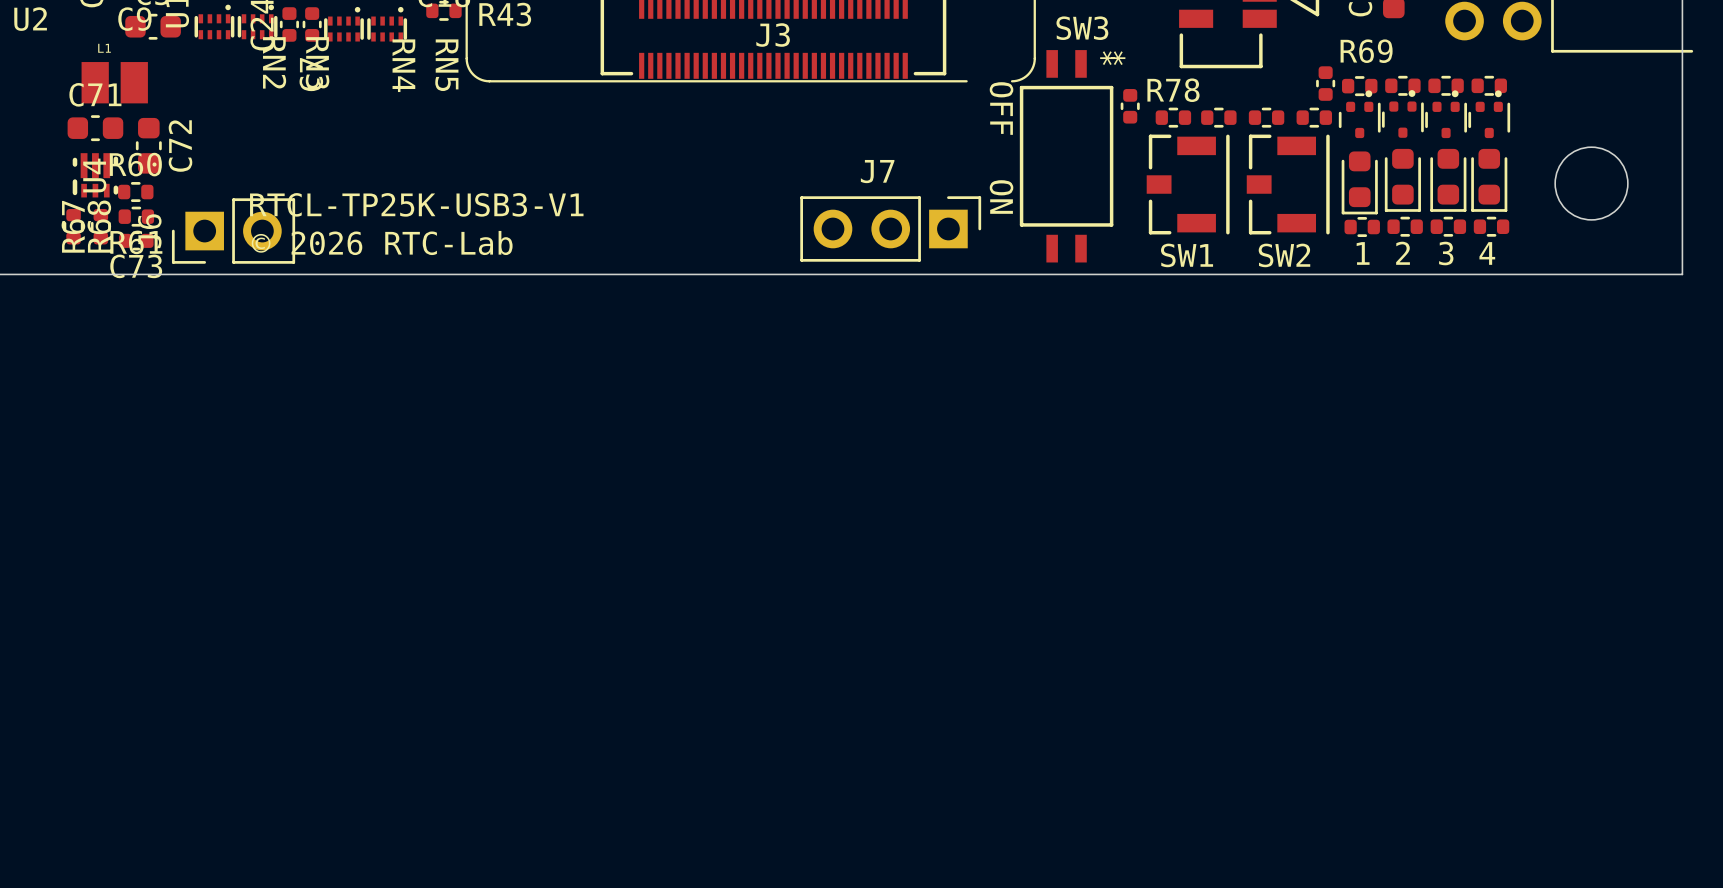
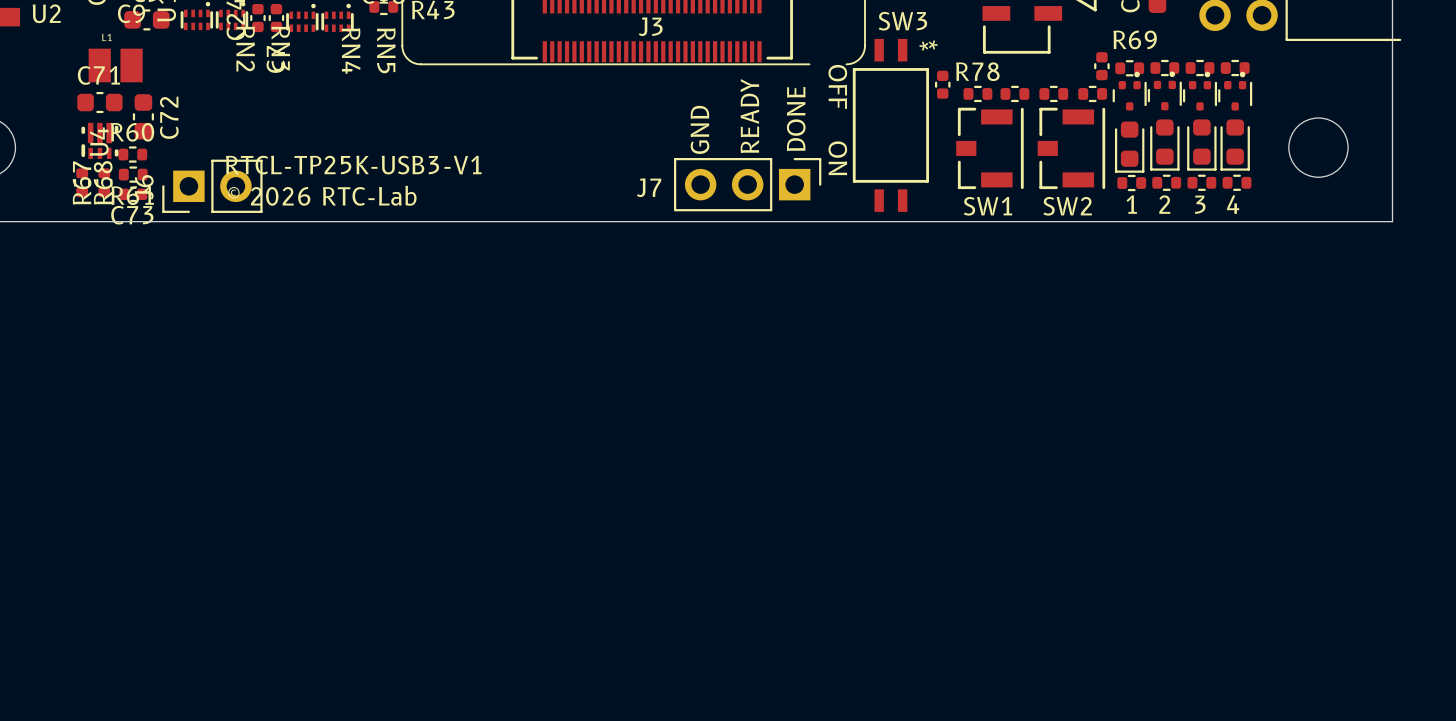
text: none -> READY (749, 116)
text: none -> DONE (796, 118)
text: none -> GND (699, 129)
J7 name position: J7 (877, 171) -> J7 (649, 187)

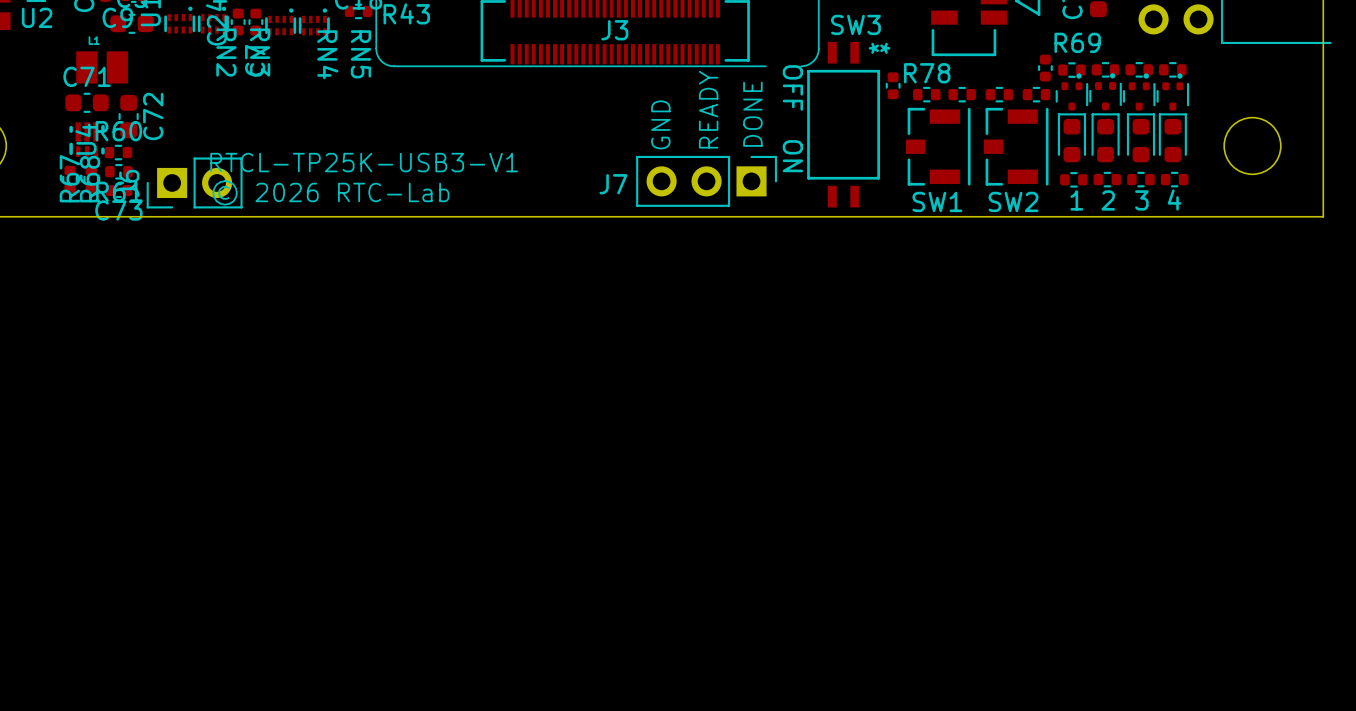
part rotation: 0° (1164, 145) -> 180° (1105, 137)
part rotation: 0° (1201, 145) -> 180° (1140, 137)
part rotation: 0° (1235, 145) -> 180° (1172, 137)
part rotation: 0° (1129, 147) -> 180° (1071, 137)

